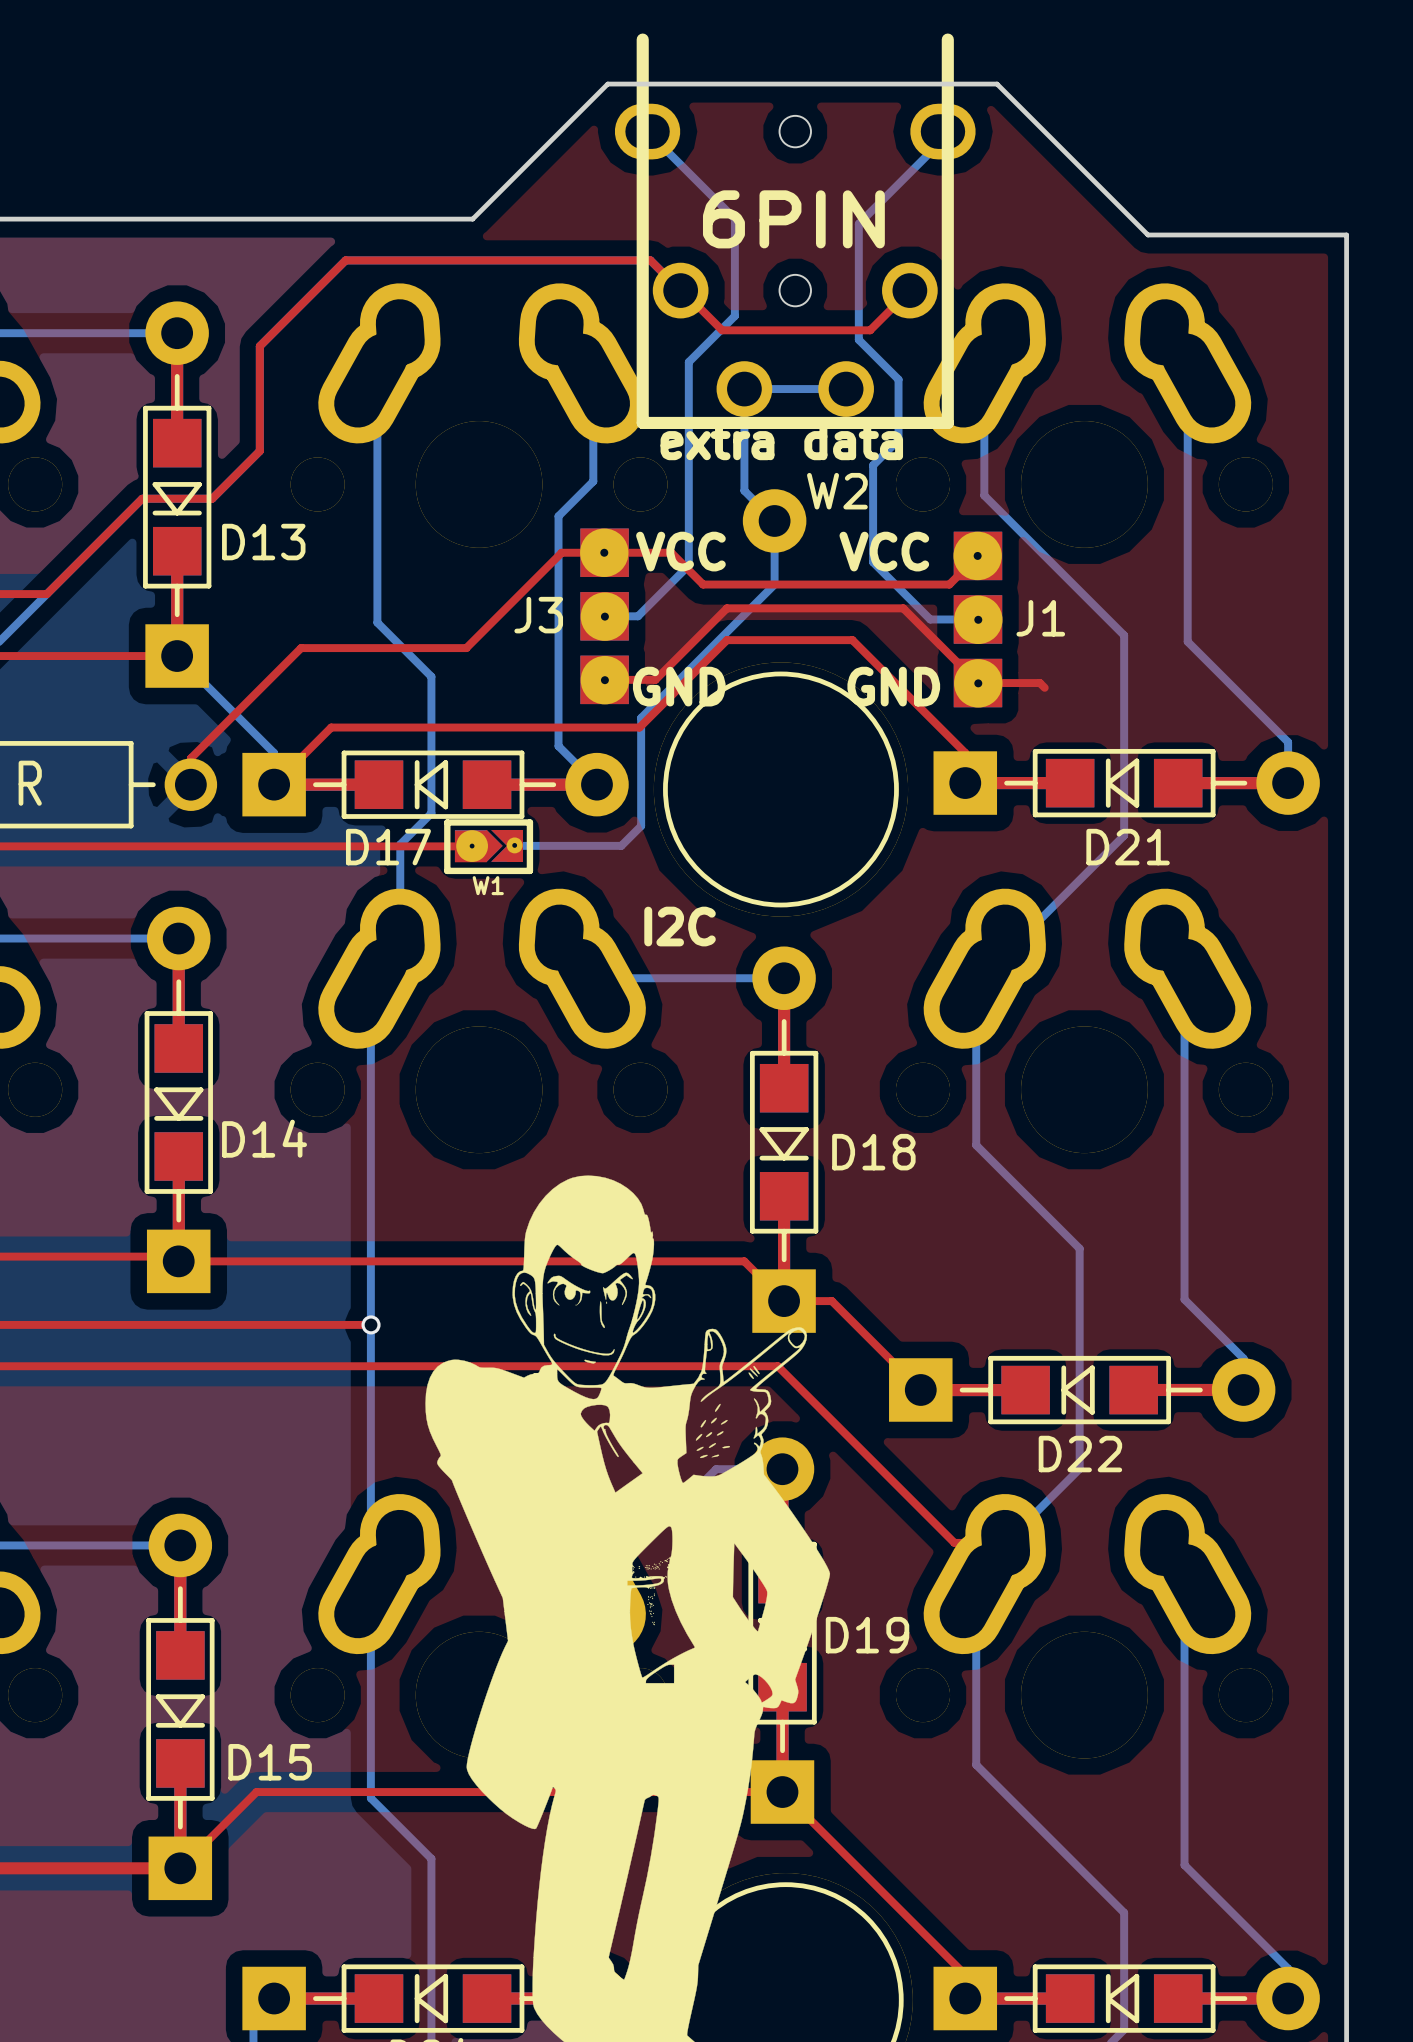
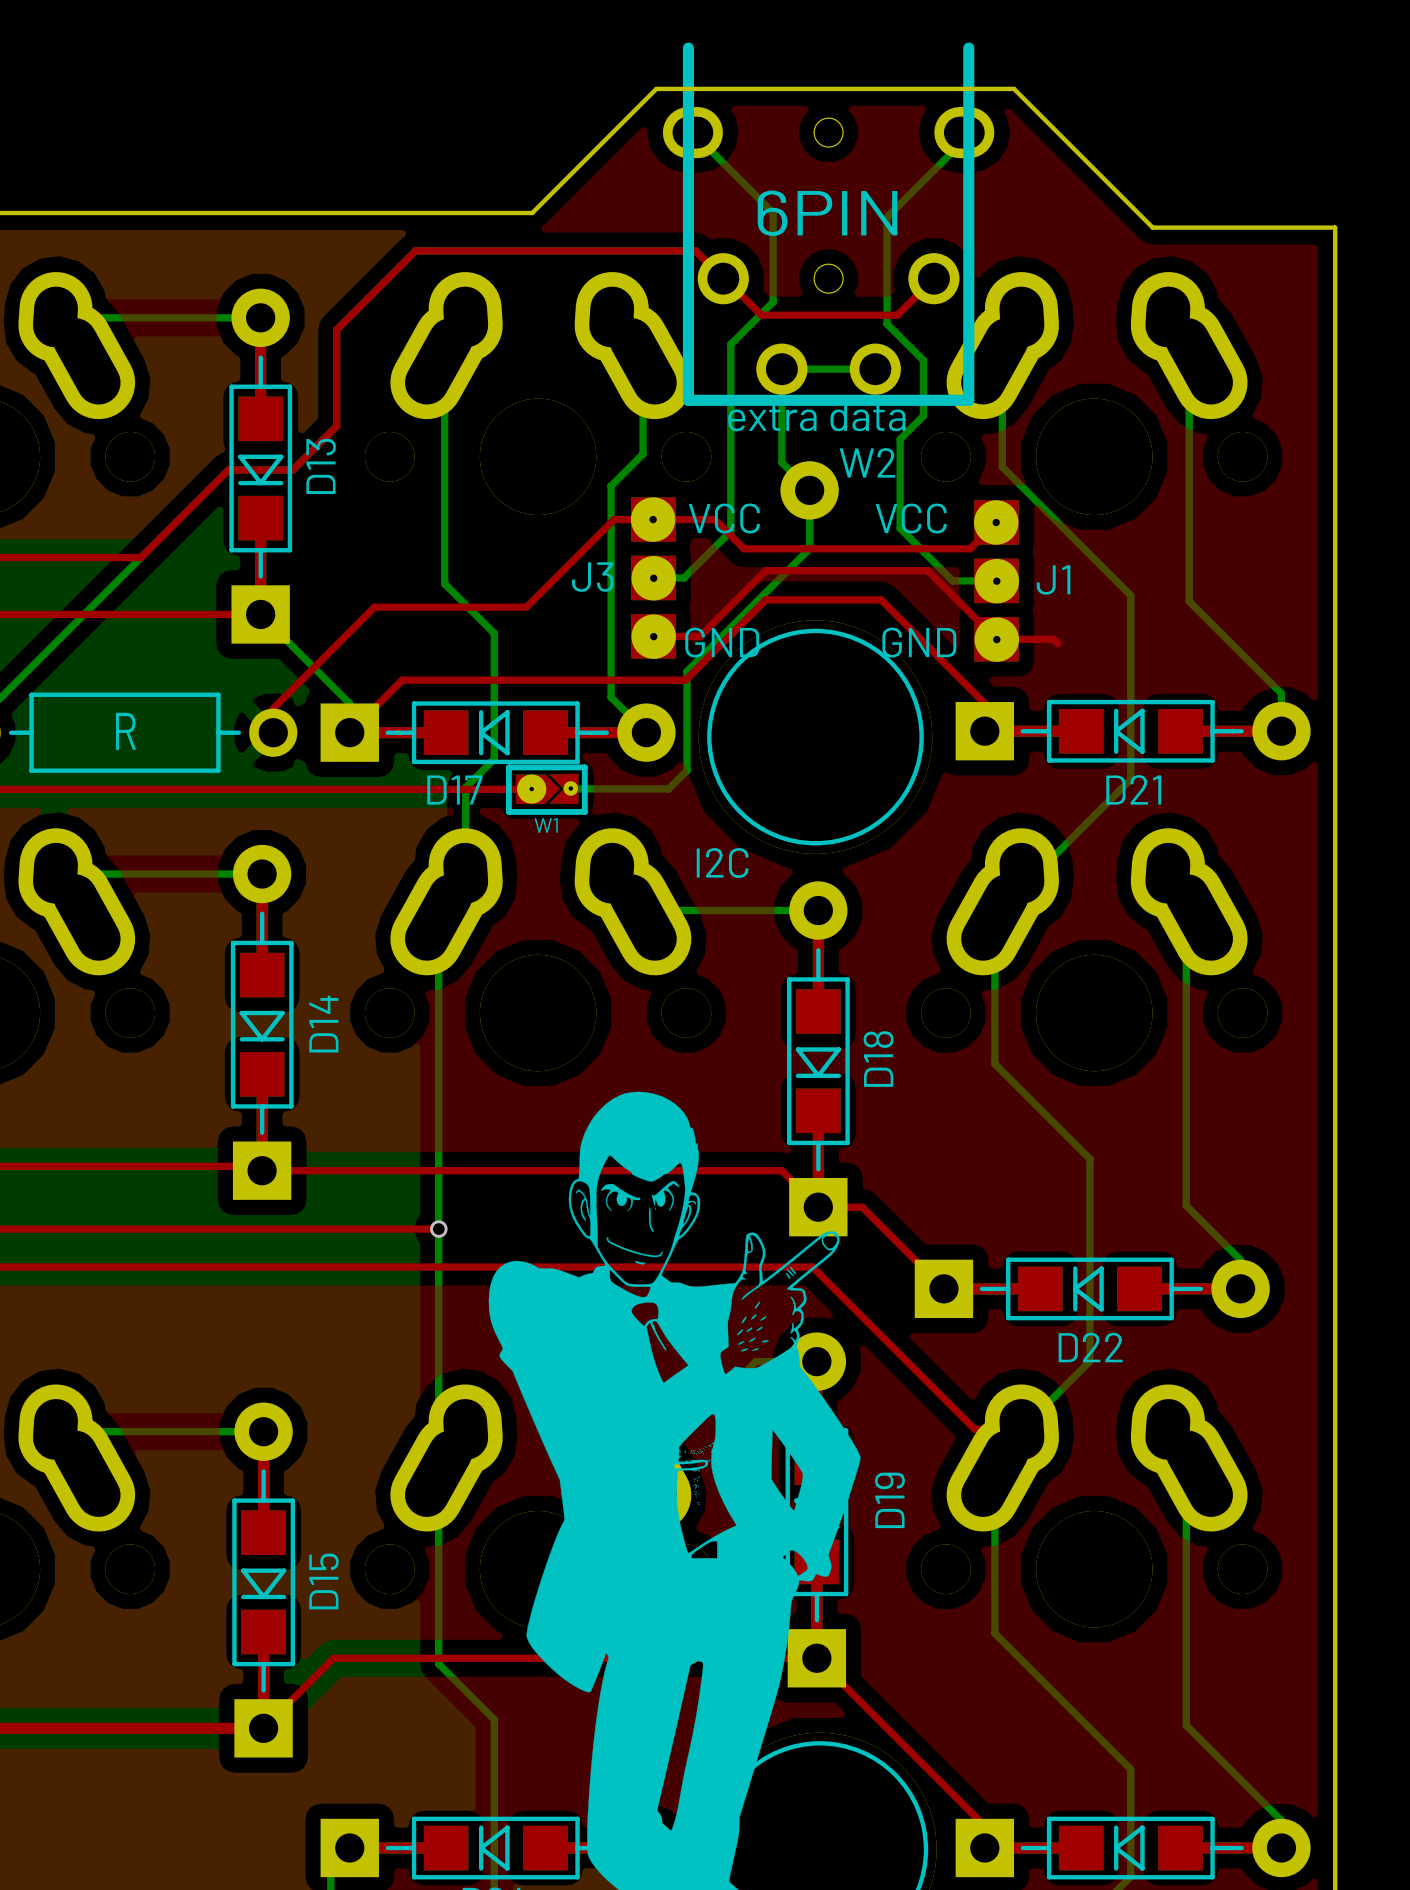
D13 name rotation: 0° (263, 542) -> 90° counterclockwise (321, 466)
D14 name rotation: 0° (264, 1138) -> 90° counterclockwise (323, 1024)
D18 name rotation: 0° (873, 1152) -> 90° counterclockwise (878, 1059)
D19 name rotation: 0° (867, 1635) -> 90° counterclockwise (889, 1500)
D15 name rotation: 0° (270, 1762) -> 90° counterclockwise (324, 1581)

